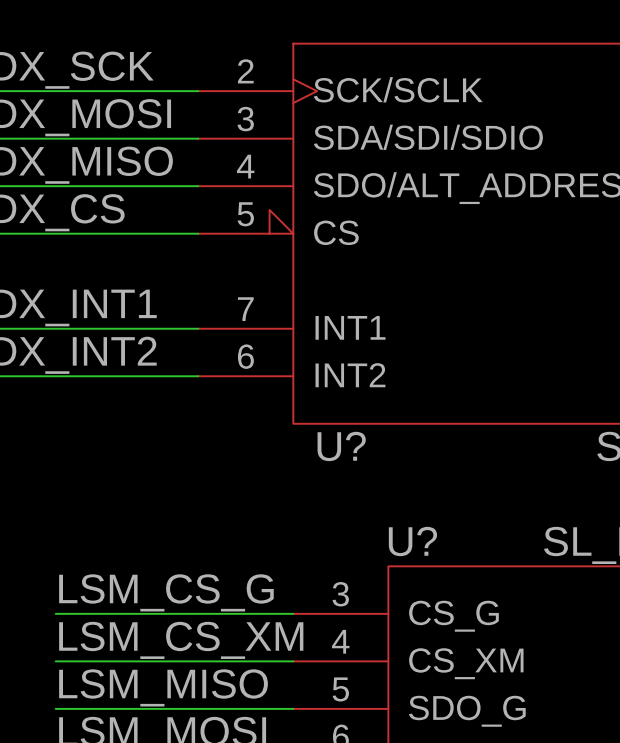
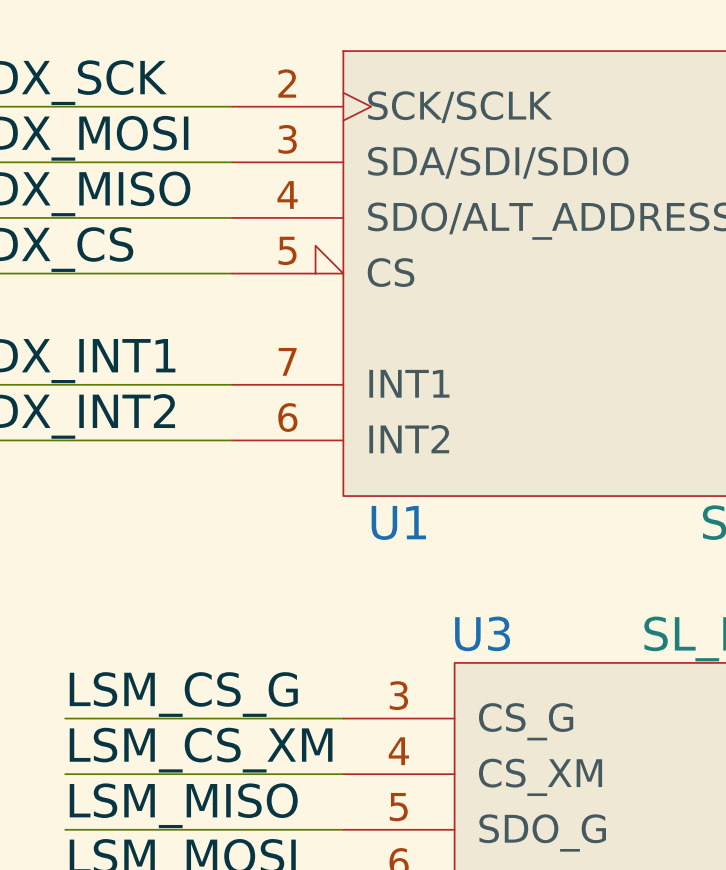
U? name: U? (341, 446) -> U1 (398, 522)
U? name: U? (412, 541) -> U3 (482, 633)

